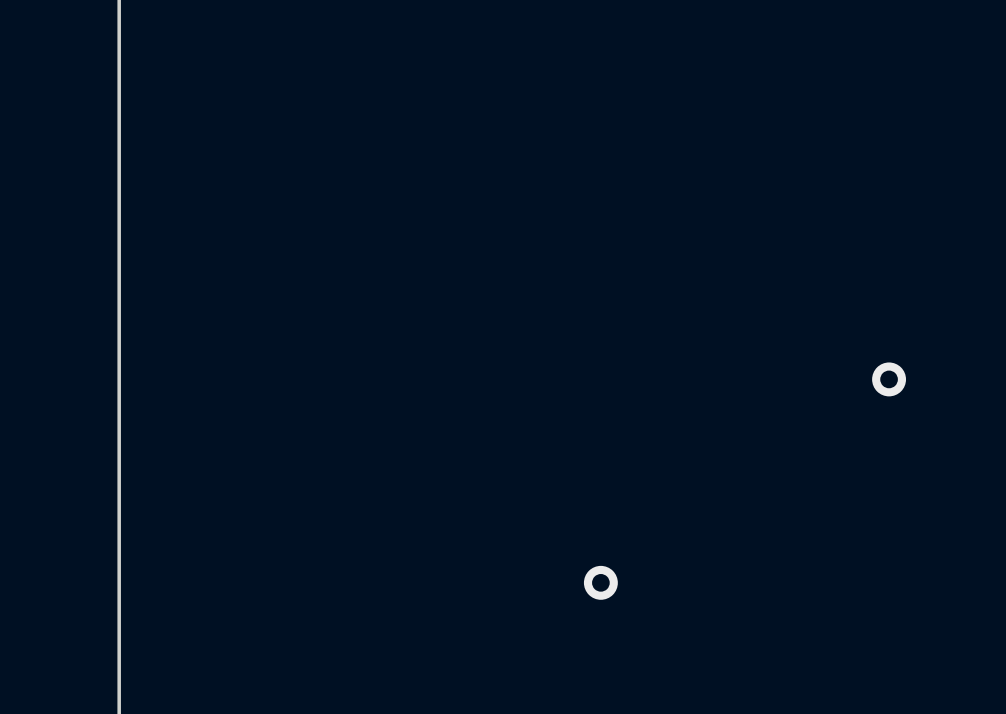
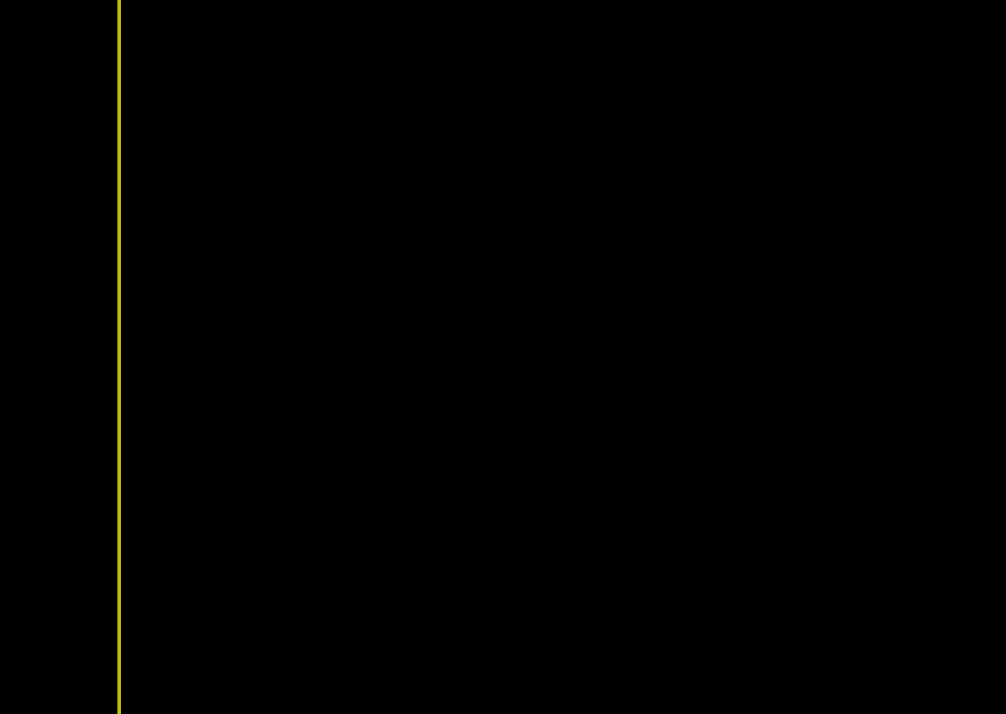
via: (889, 379) -> none
via: (600, 582) -> none

